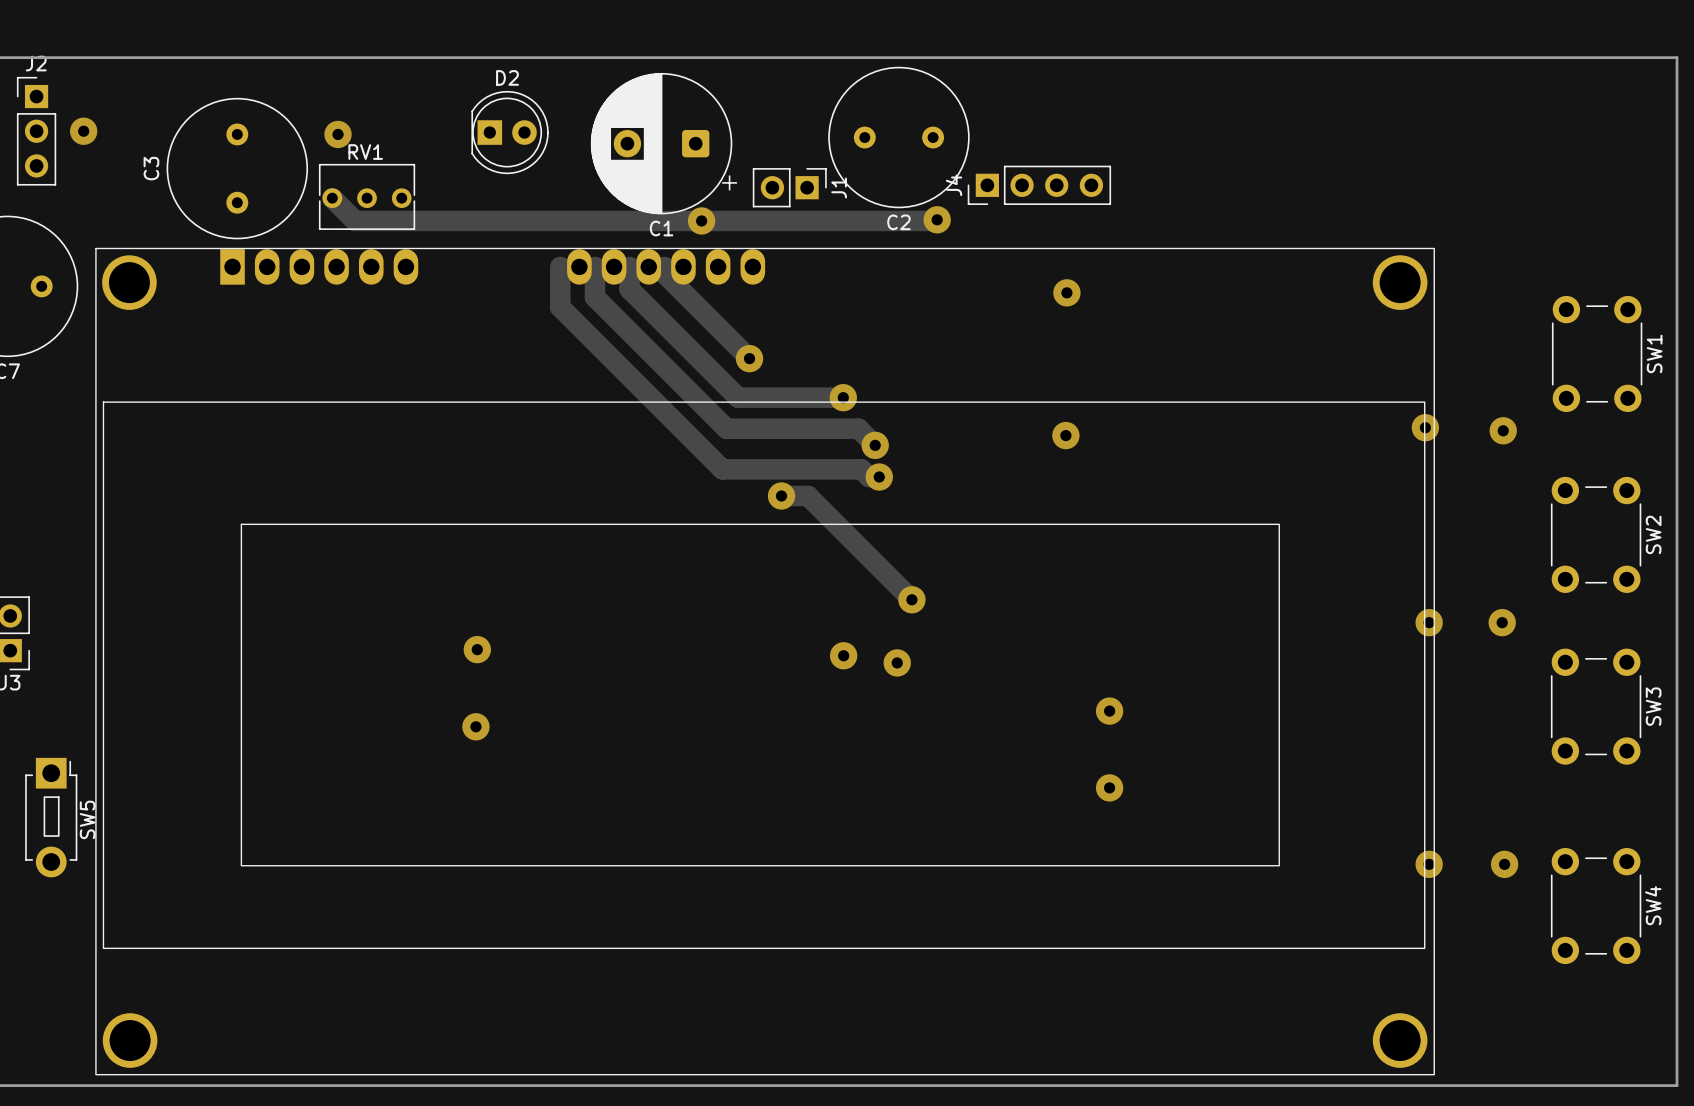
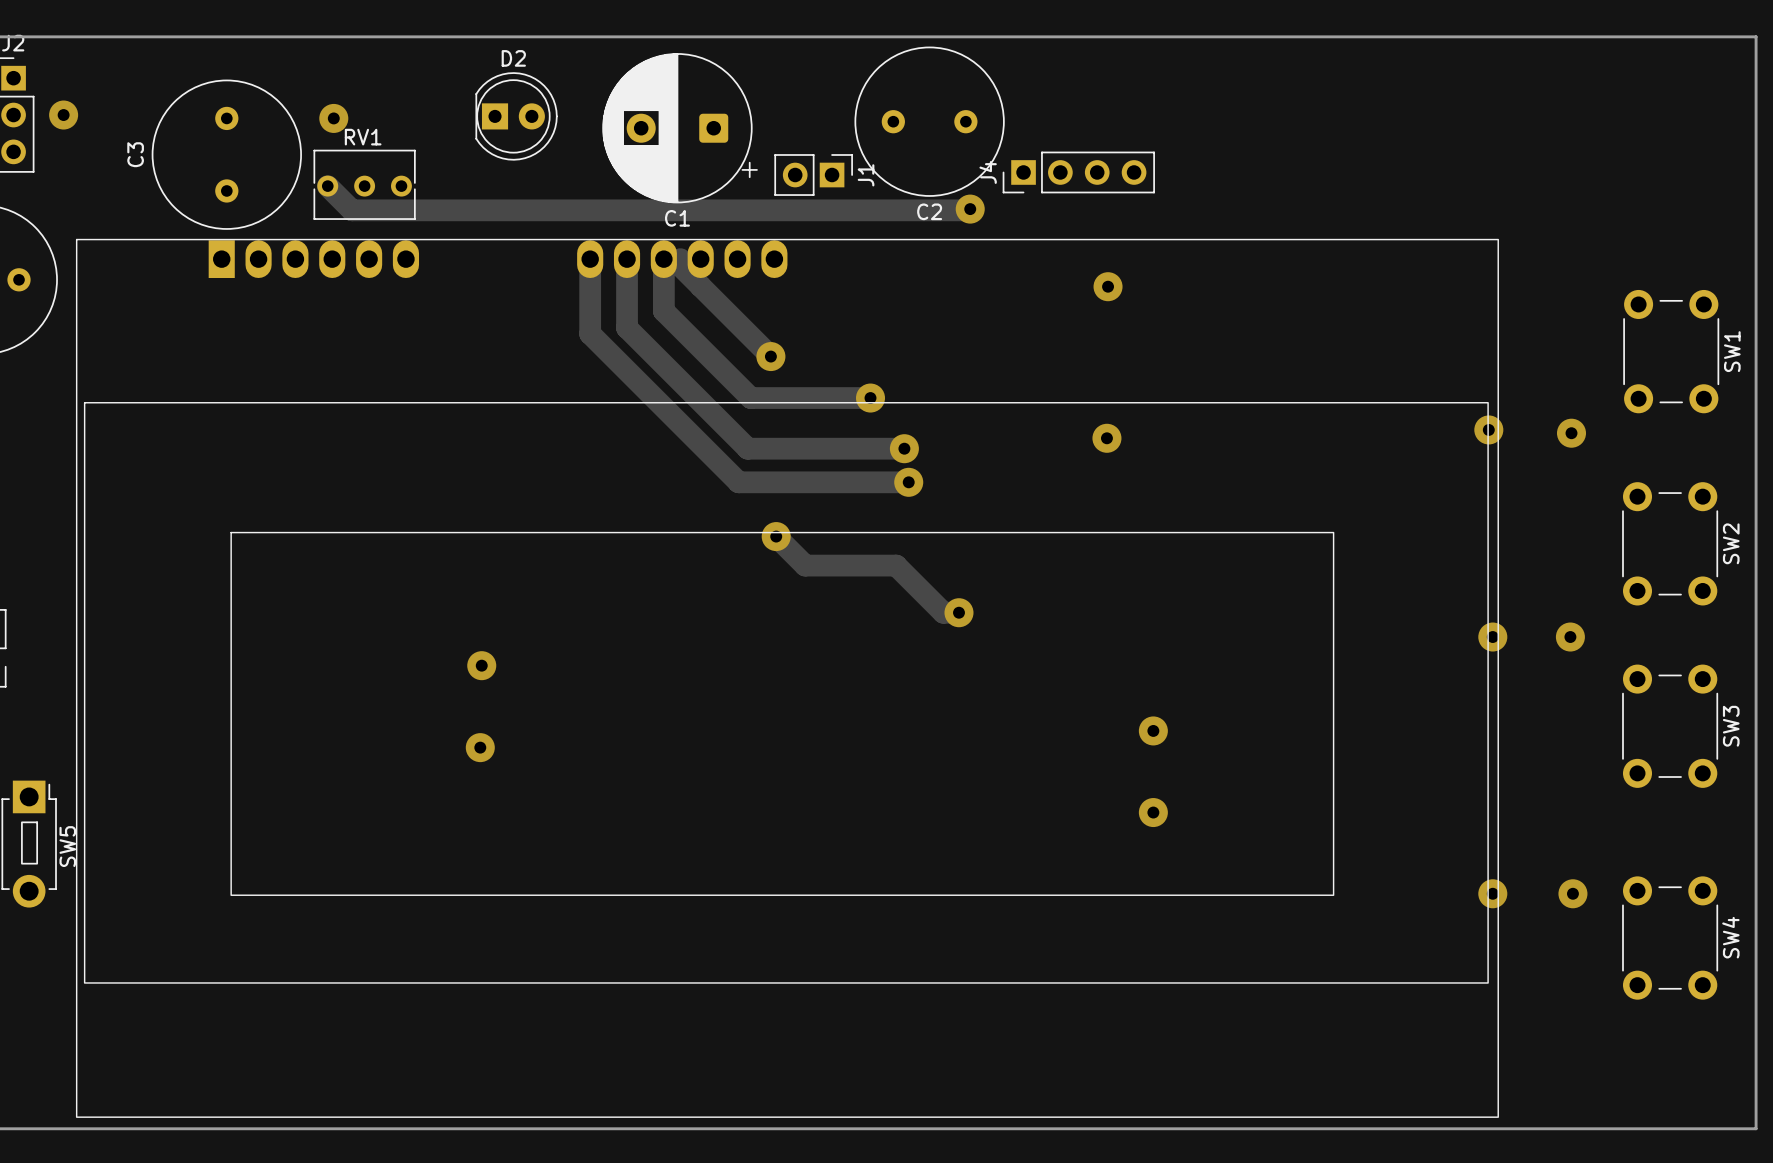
via: (701, 220) -> none
part footprint: [95, 247, 1435, 1076] -> [75, 238, 1499, 1118]
track: (560, 266) (560, 307) (722, 469) (861, 469) (869, 477) -> (590, 259) (590, 333) (738, 482) (898, 482)
track: (594, 266) (594, 297) (726, 428) (858, 428) (875, 445) -> (627, 259) (627, 327) (747, 448) (904, 448)
track: (629, 266) (629, 289) (738, 397) -> (663, 259) (663, 311) (750, 398) (758, 398)
track: (781, 496) (808, 496) (867, 555) -> (776, 536) (805, 565) (896, 565)
via position: (781, 496) -> (776, 536)
via position: (911, 599) -> (958, 612)
via: (843, 655) -> none
via: (897, 662) -> none

